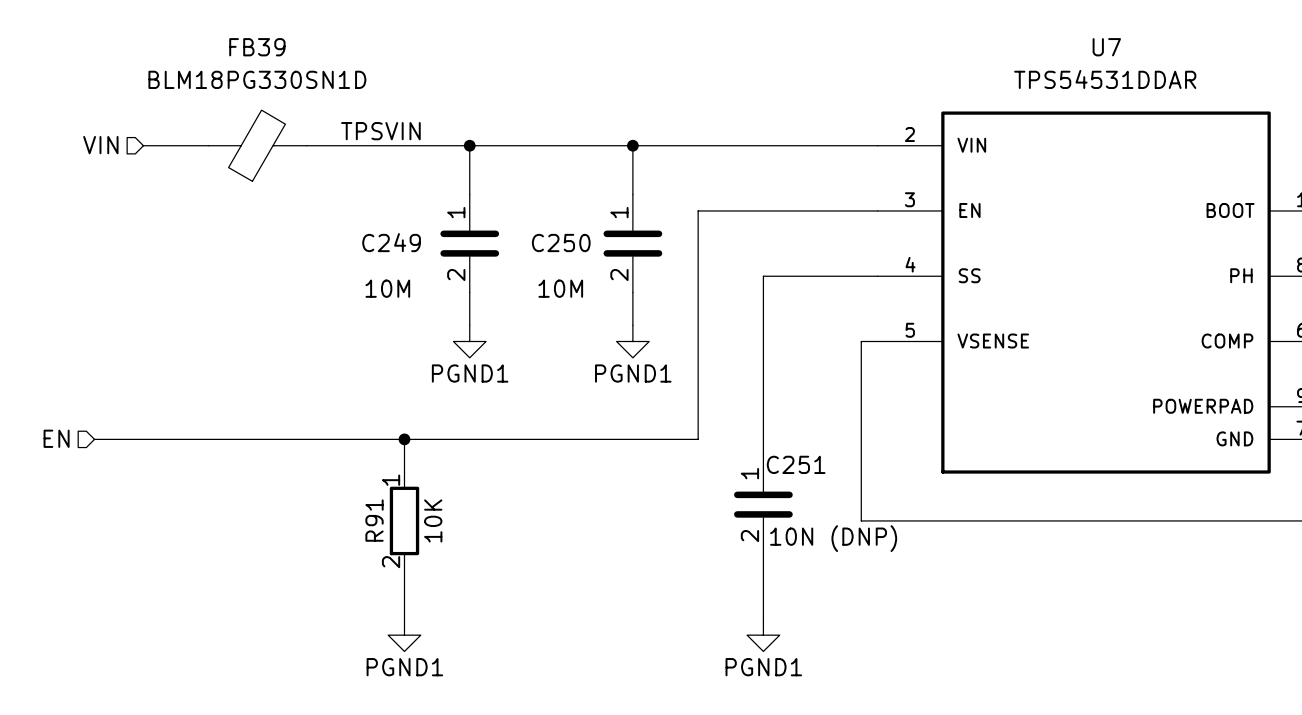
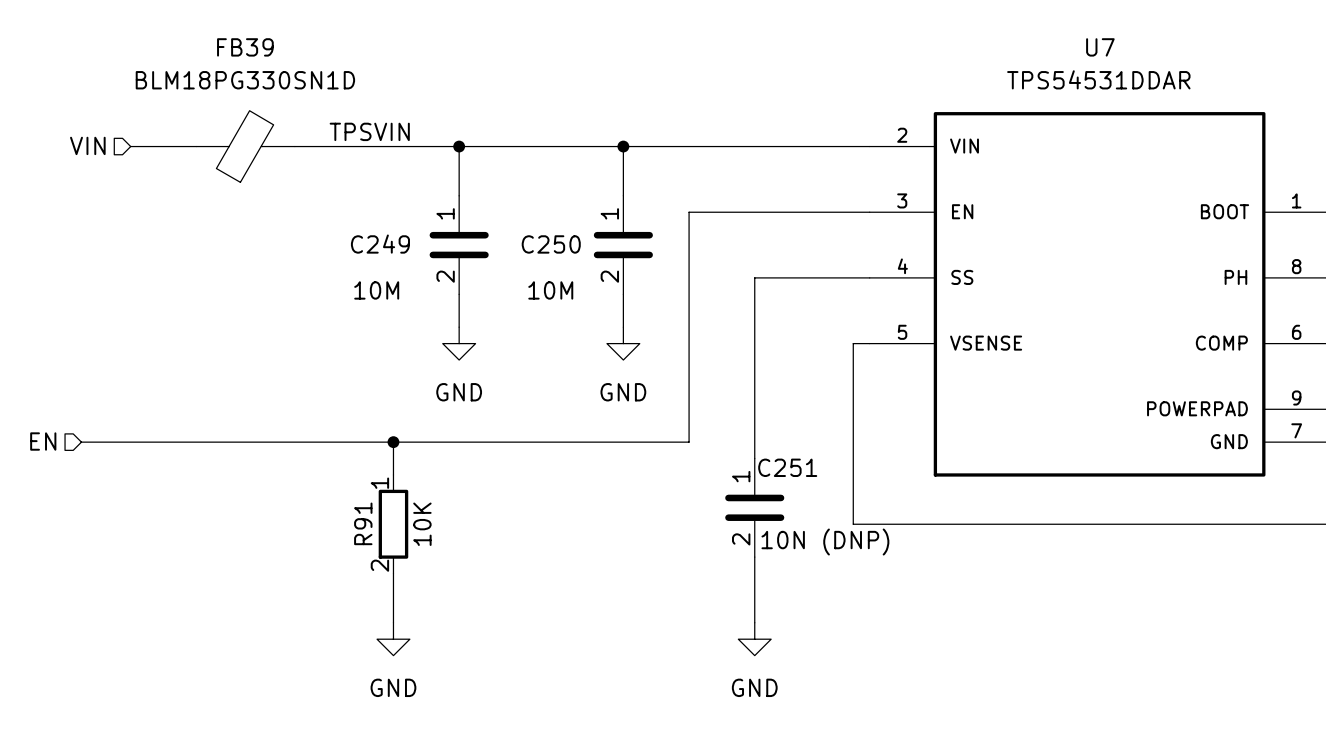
power symbol: PGND1 (469, 341) -> GND (459, 343)
power symbol: PGND1 (632, 341) -> GND (623, 343)
power symbol: PGND1 (404, 635) -> GND (393, 639)
power symbol: PGND1 (763, 635) -> GND (754, 639)

